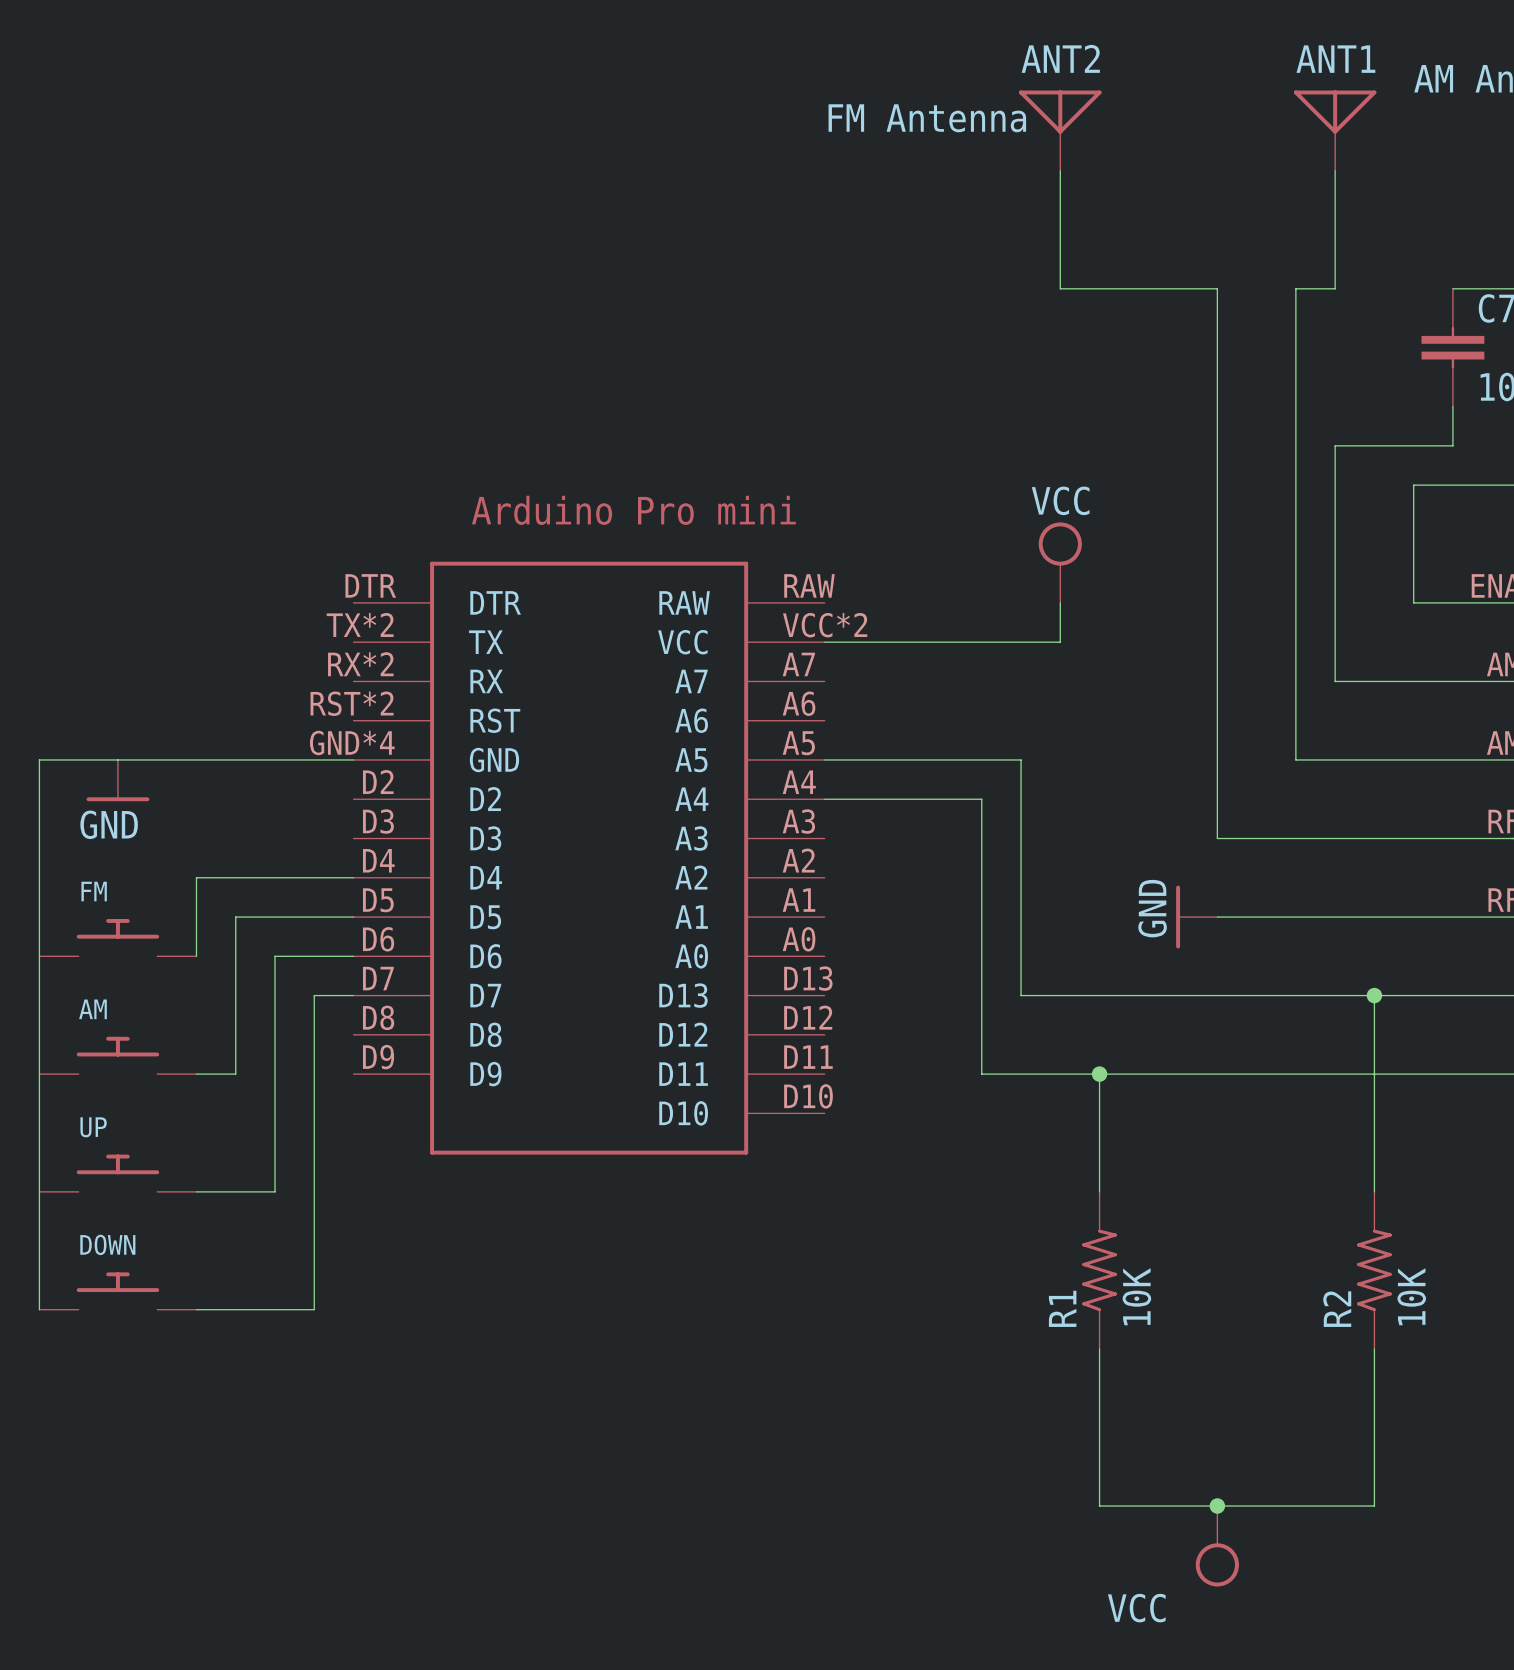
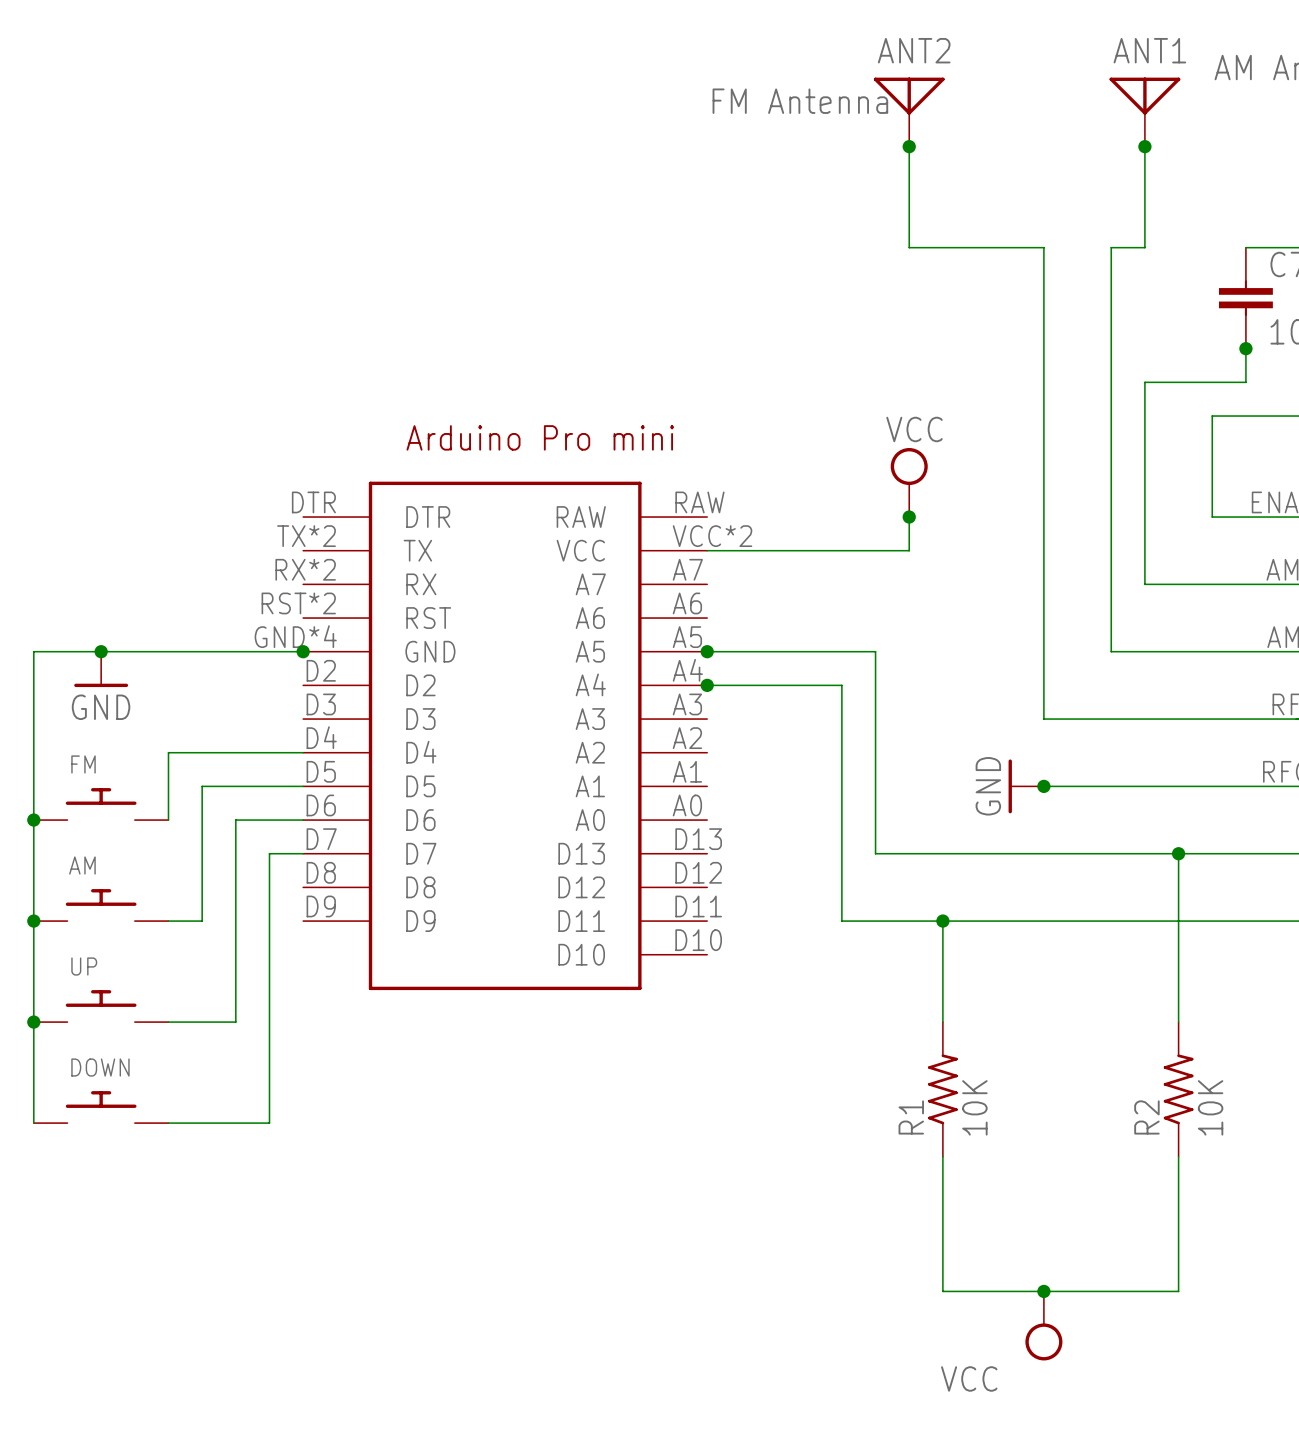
junction: none -> (909, 146)
junction: none -> (1144, 146)
junction: none -> (1245, 348)
junction: none -> (909, 517)
junction: none -> (101, 651)
junction: none -> (303, 651)
junction: none -> (707, 651)
junction: none -> (707, 685)
junction: none -> (1043, 786)
junction: none -> (33, 820)
junction: none -> (33, 921)
junction: none -> (33, 1022)

